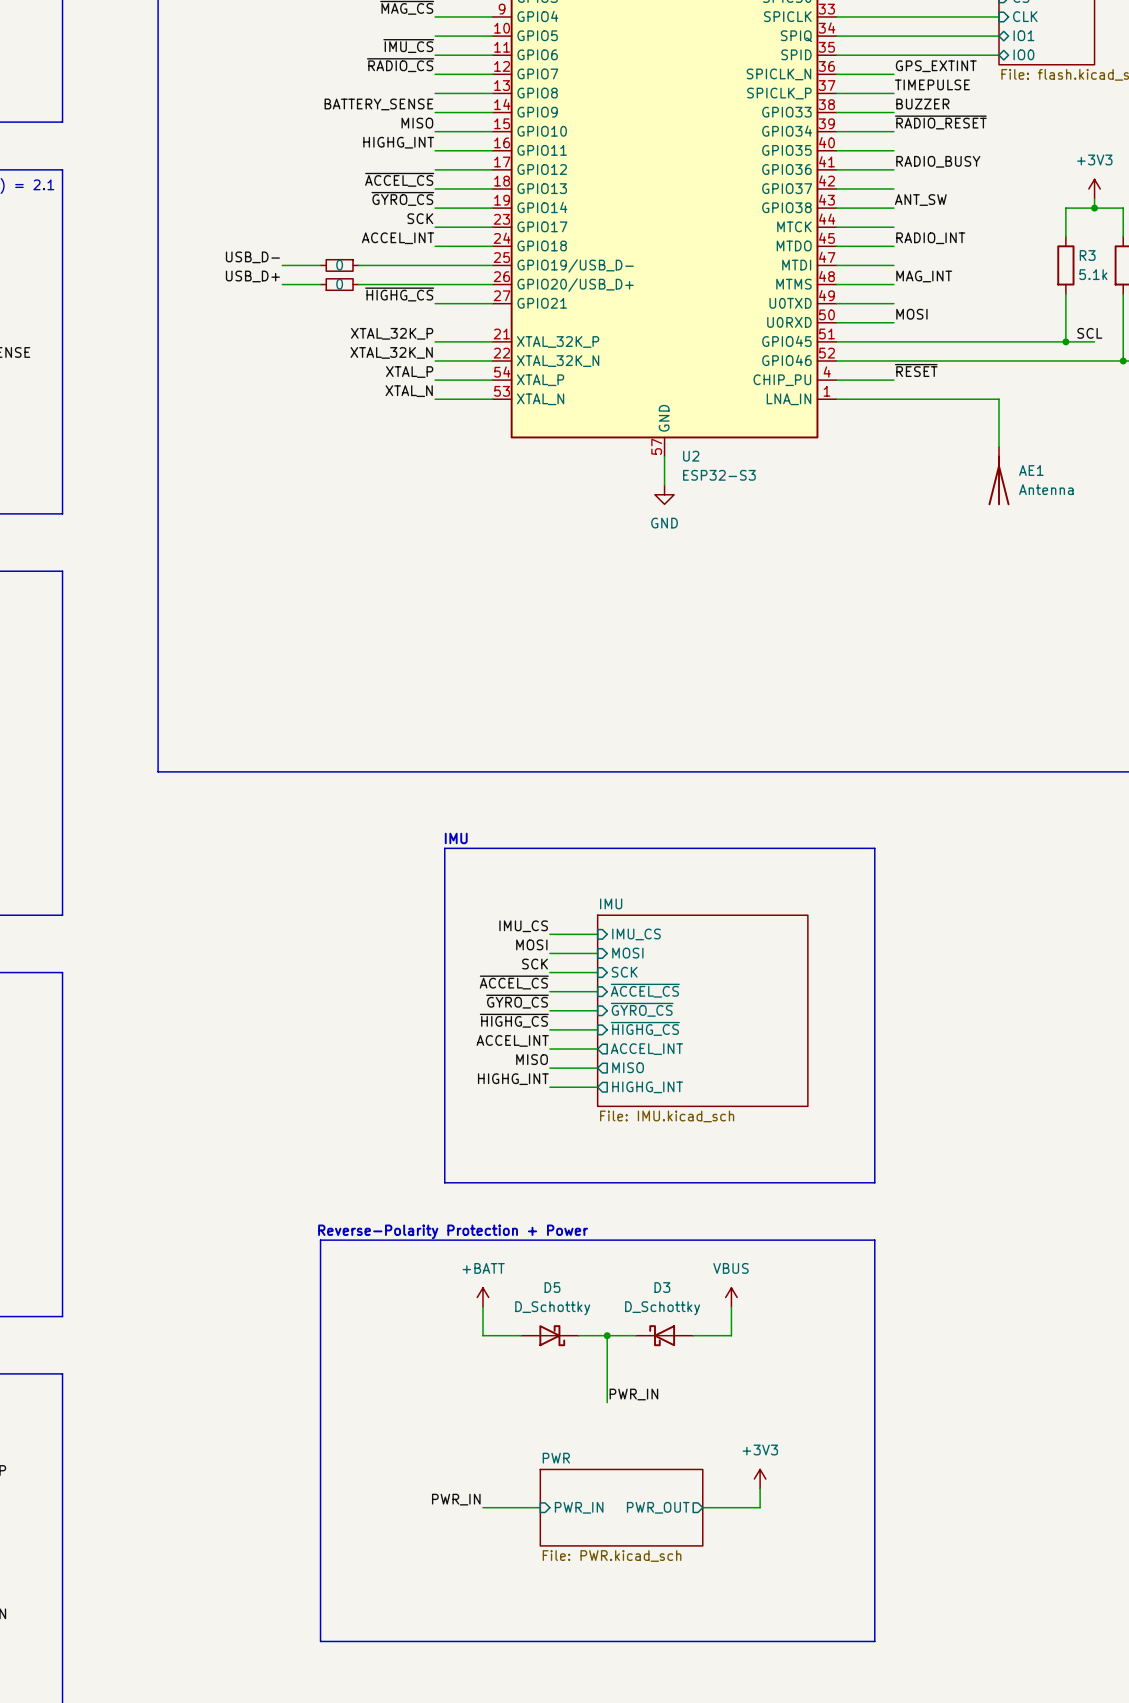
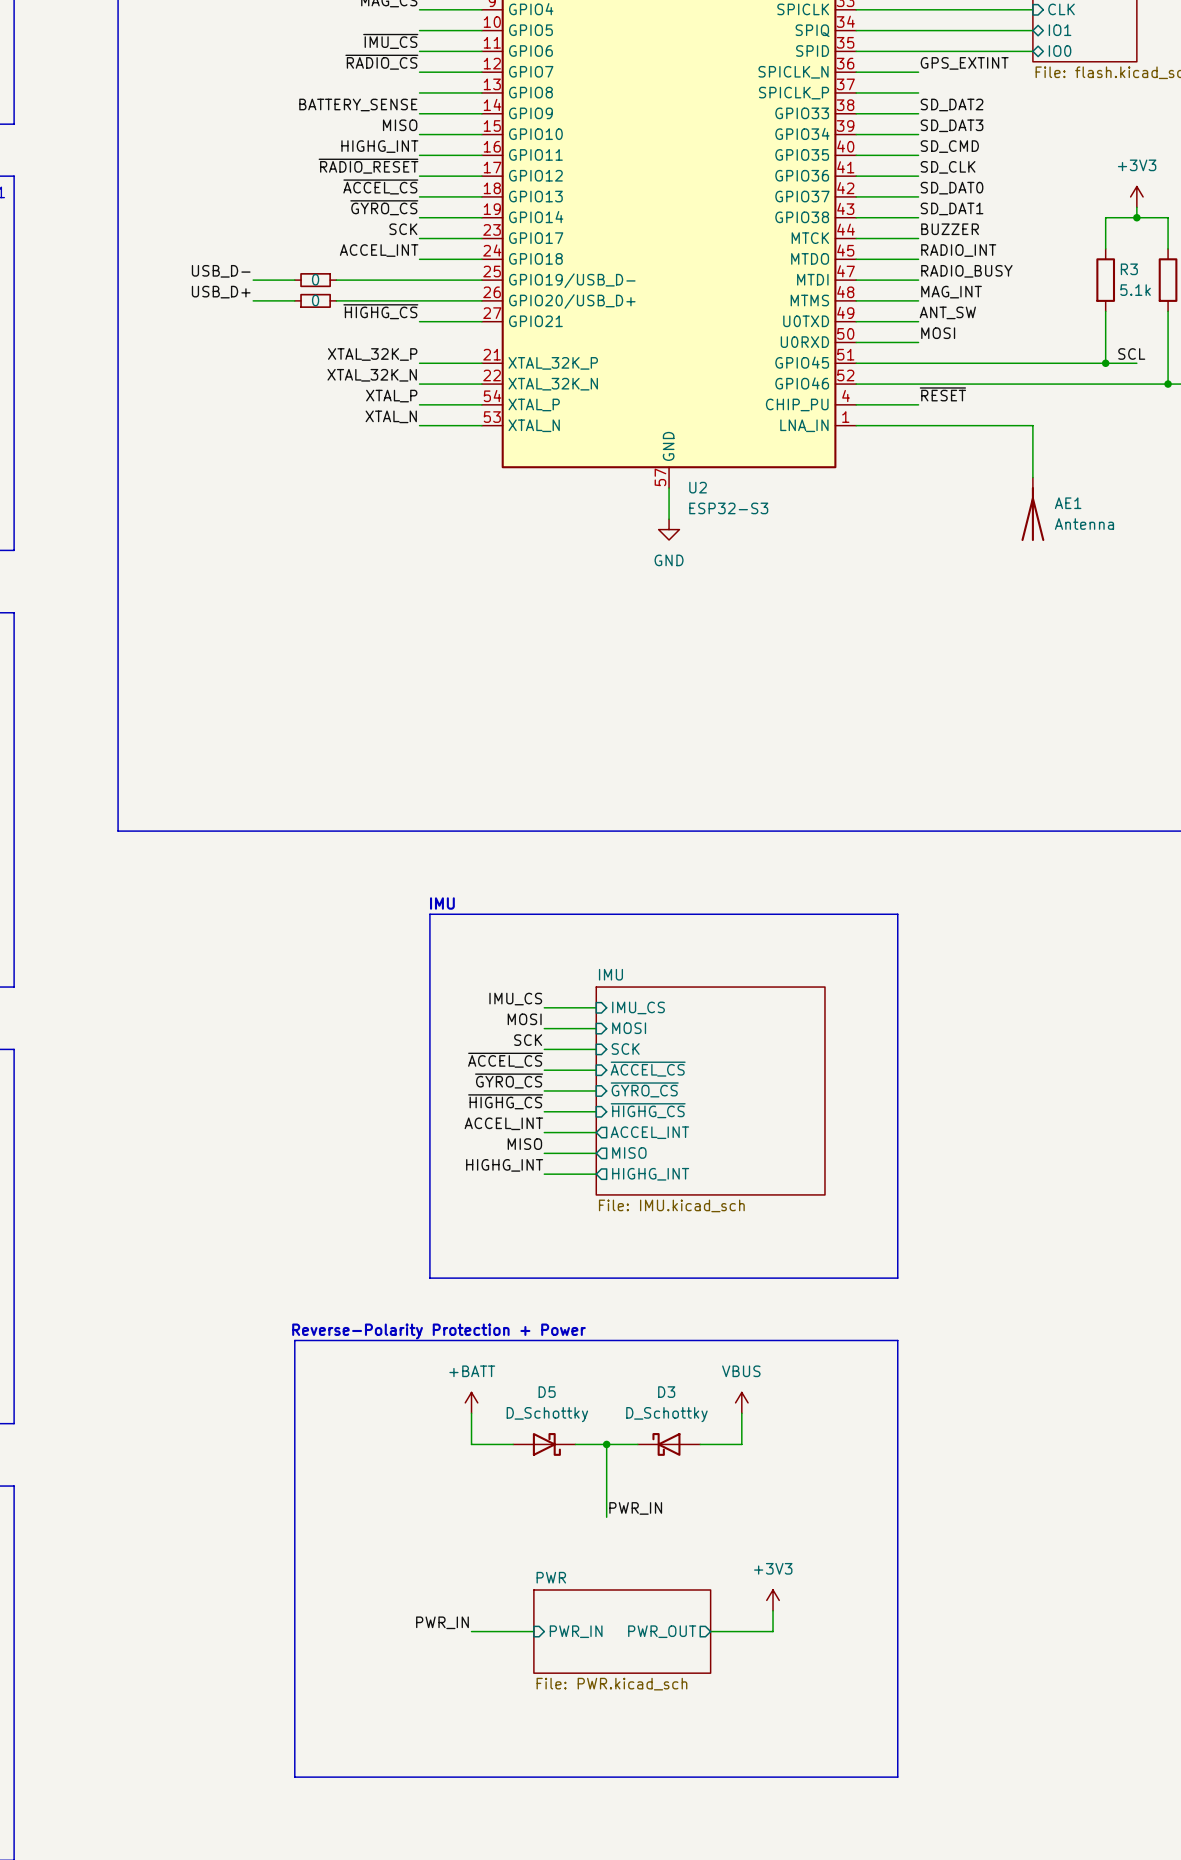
label: TIMEPULSE (932, 84) -> none
label: BUZZER (922, 104) -> SD_DAT2 (952, 104)
label: ~{RADIO_RESET} (940, 122) -> SD_DAT3 (952, 125)
label: none -> SD_CMD (949, 146)
label: none -> ~{RADIO_RESET} (368, 166)
label: RADIO_BUSY (938, 161) -> SD_CLK (948, 167)
label: none -> SD_DAT0 (952, 188)
label: ANT_SW (920, 200) -> SD_DAT1 (952, 208)
label: none -> BUZZER (950, 229)
label: none -> RADIO_BUSY (966, 271)
label: none -> ANT_SW (947, 312)

